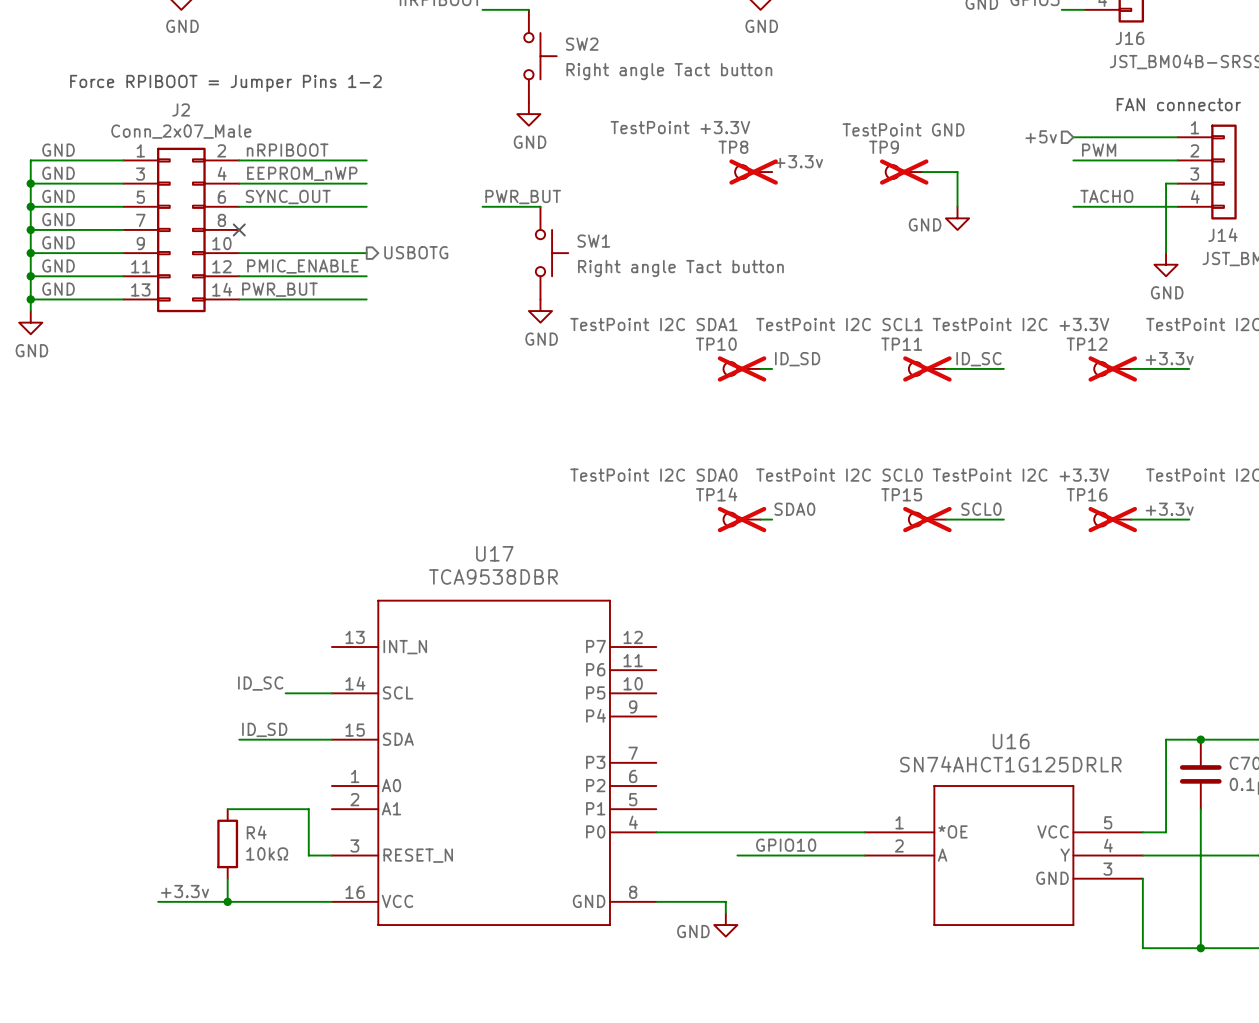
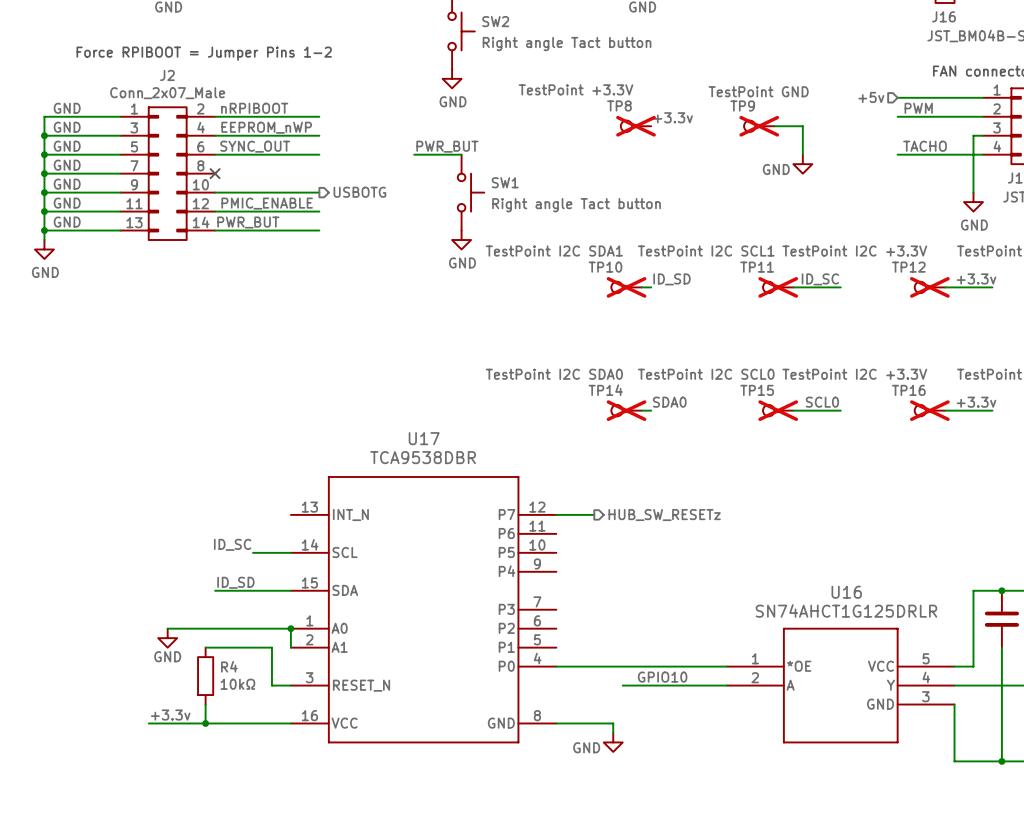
wire: none -> (556, 514) (594, 514)
hierarchical label: none -> HUB_SW_RESETz (664, 515)
wire: none -> (167, 628) (290, 628) (290, 647)
junction: none -> (290, 628)
power symbol: none -> GND (167, 638)

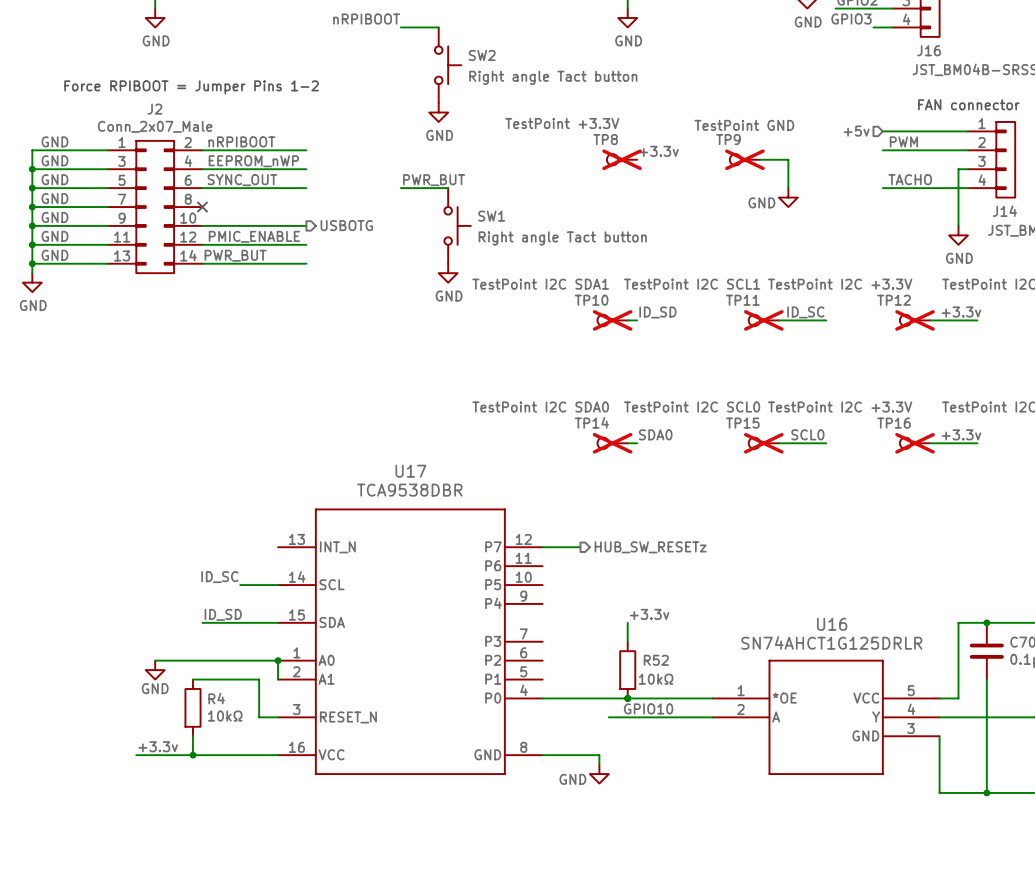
label: none -> +3.3v (649, 614)
wire: none -> (627, 622) (627, 641)
R52: none -> 10kΩ (627, 670)
junction: none -> (627, 698)

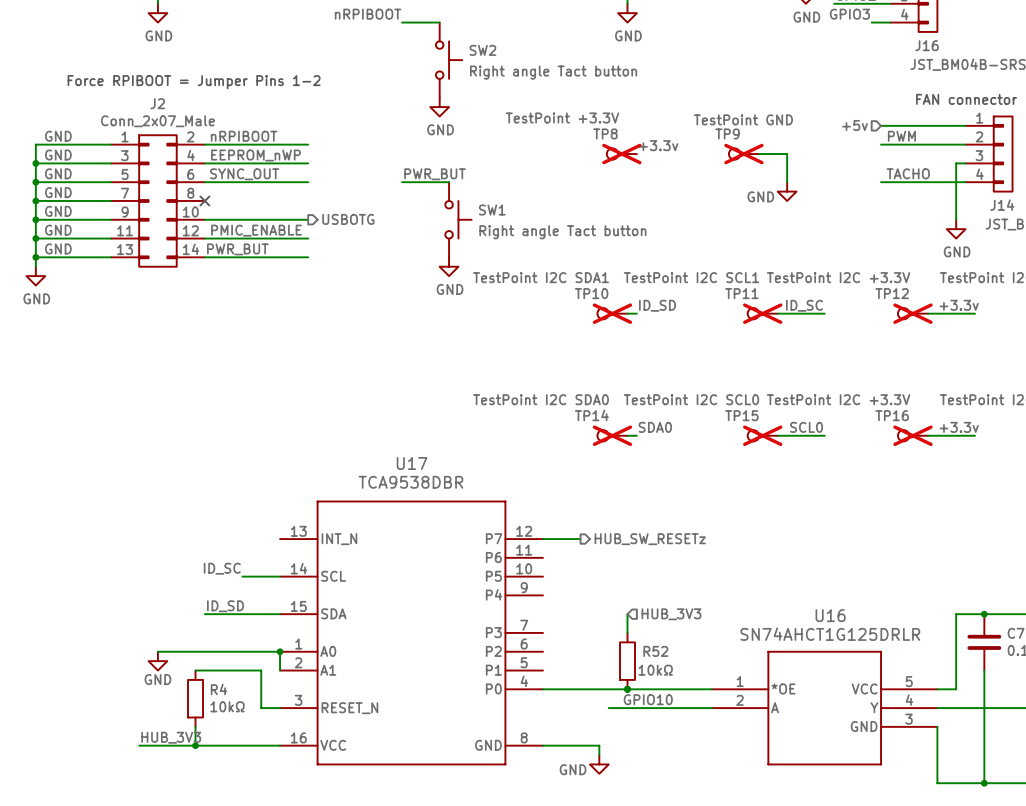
label: +3.3v (649, 614) -> none
hierarchical label: none -> HUB_3V3 (671, 614)
label: +3.3v (158, 746) -> HUB_3V3 (171, 737)

